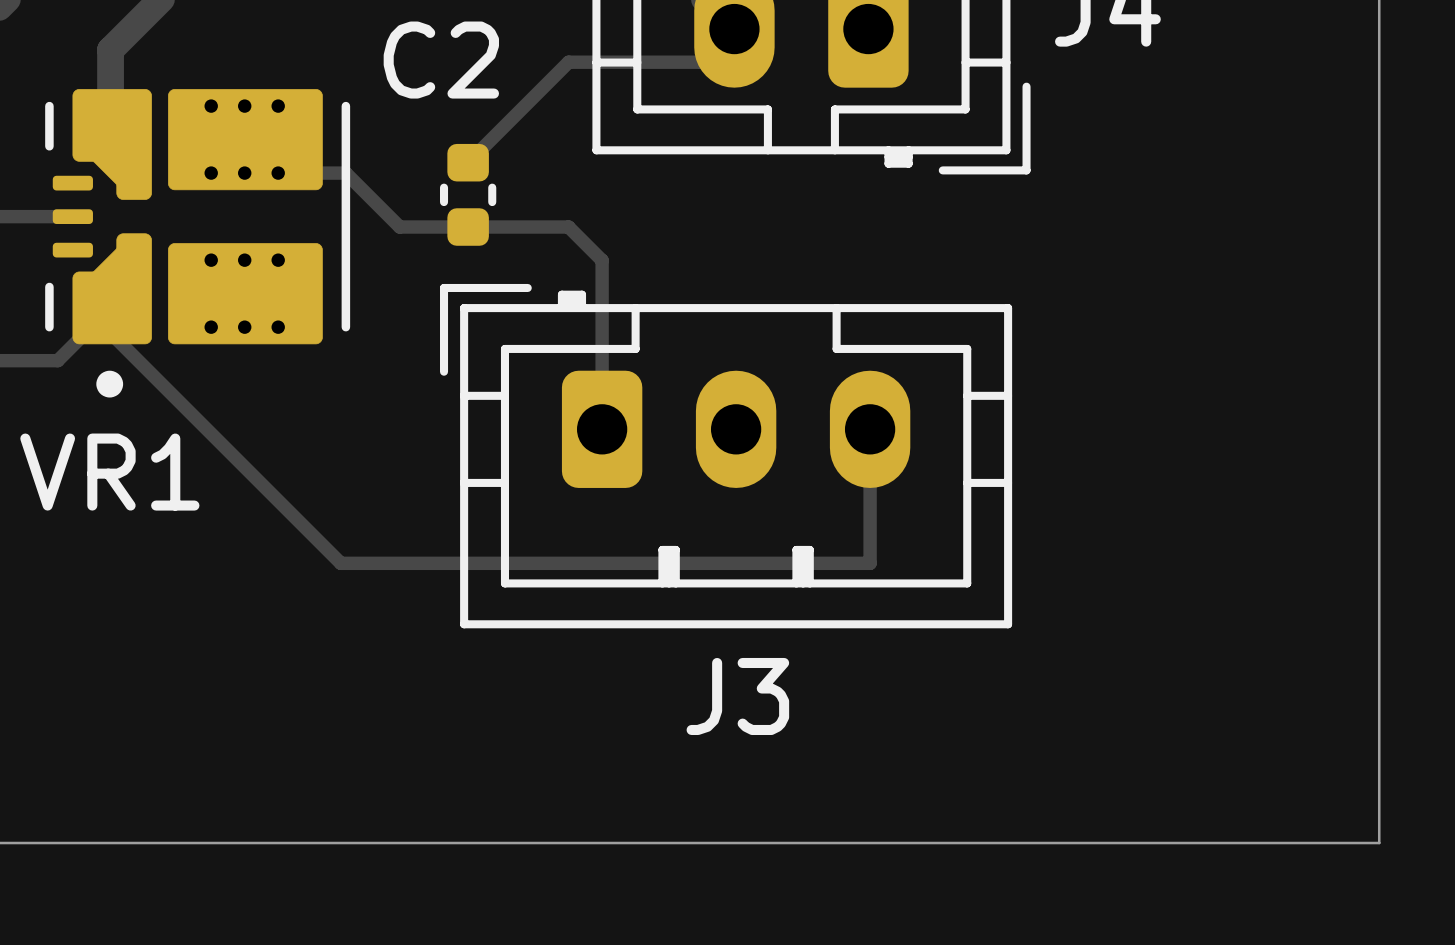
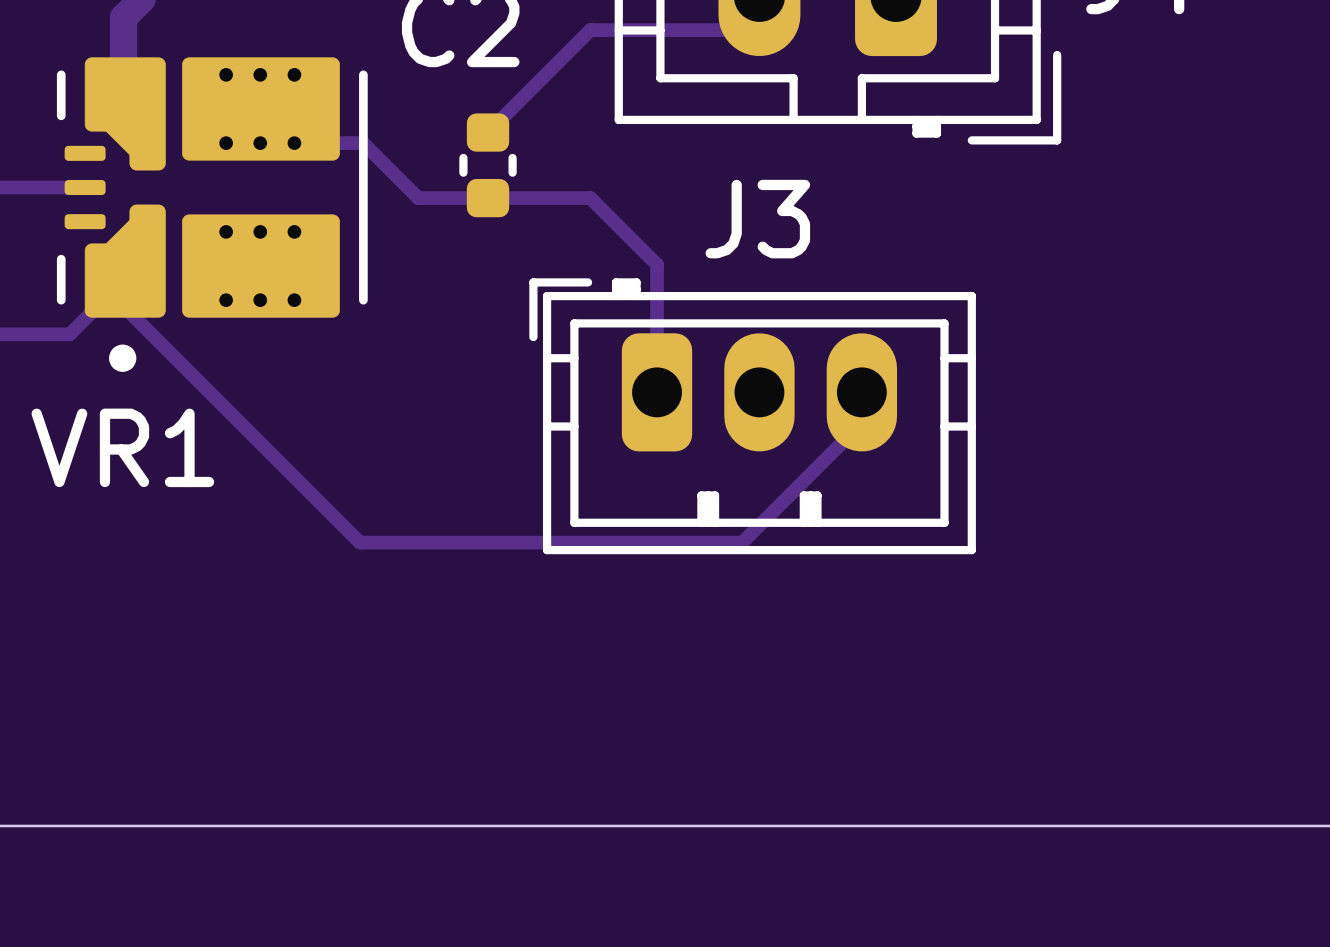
track: (602, 260) (602, 429) -> (624, 232) (657, 264) (657, 392)
J3 footprint: [440, 283, 1013, 629] -> [529, 278, 976, 555]
track: (870, 429) (870, 563) (340, 563) -> (861, 392) (861, 423) (742, 542) (359, 542) (358, 540)
J3 name position: J3 (737, 696) -> J3 (757, 219)

